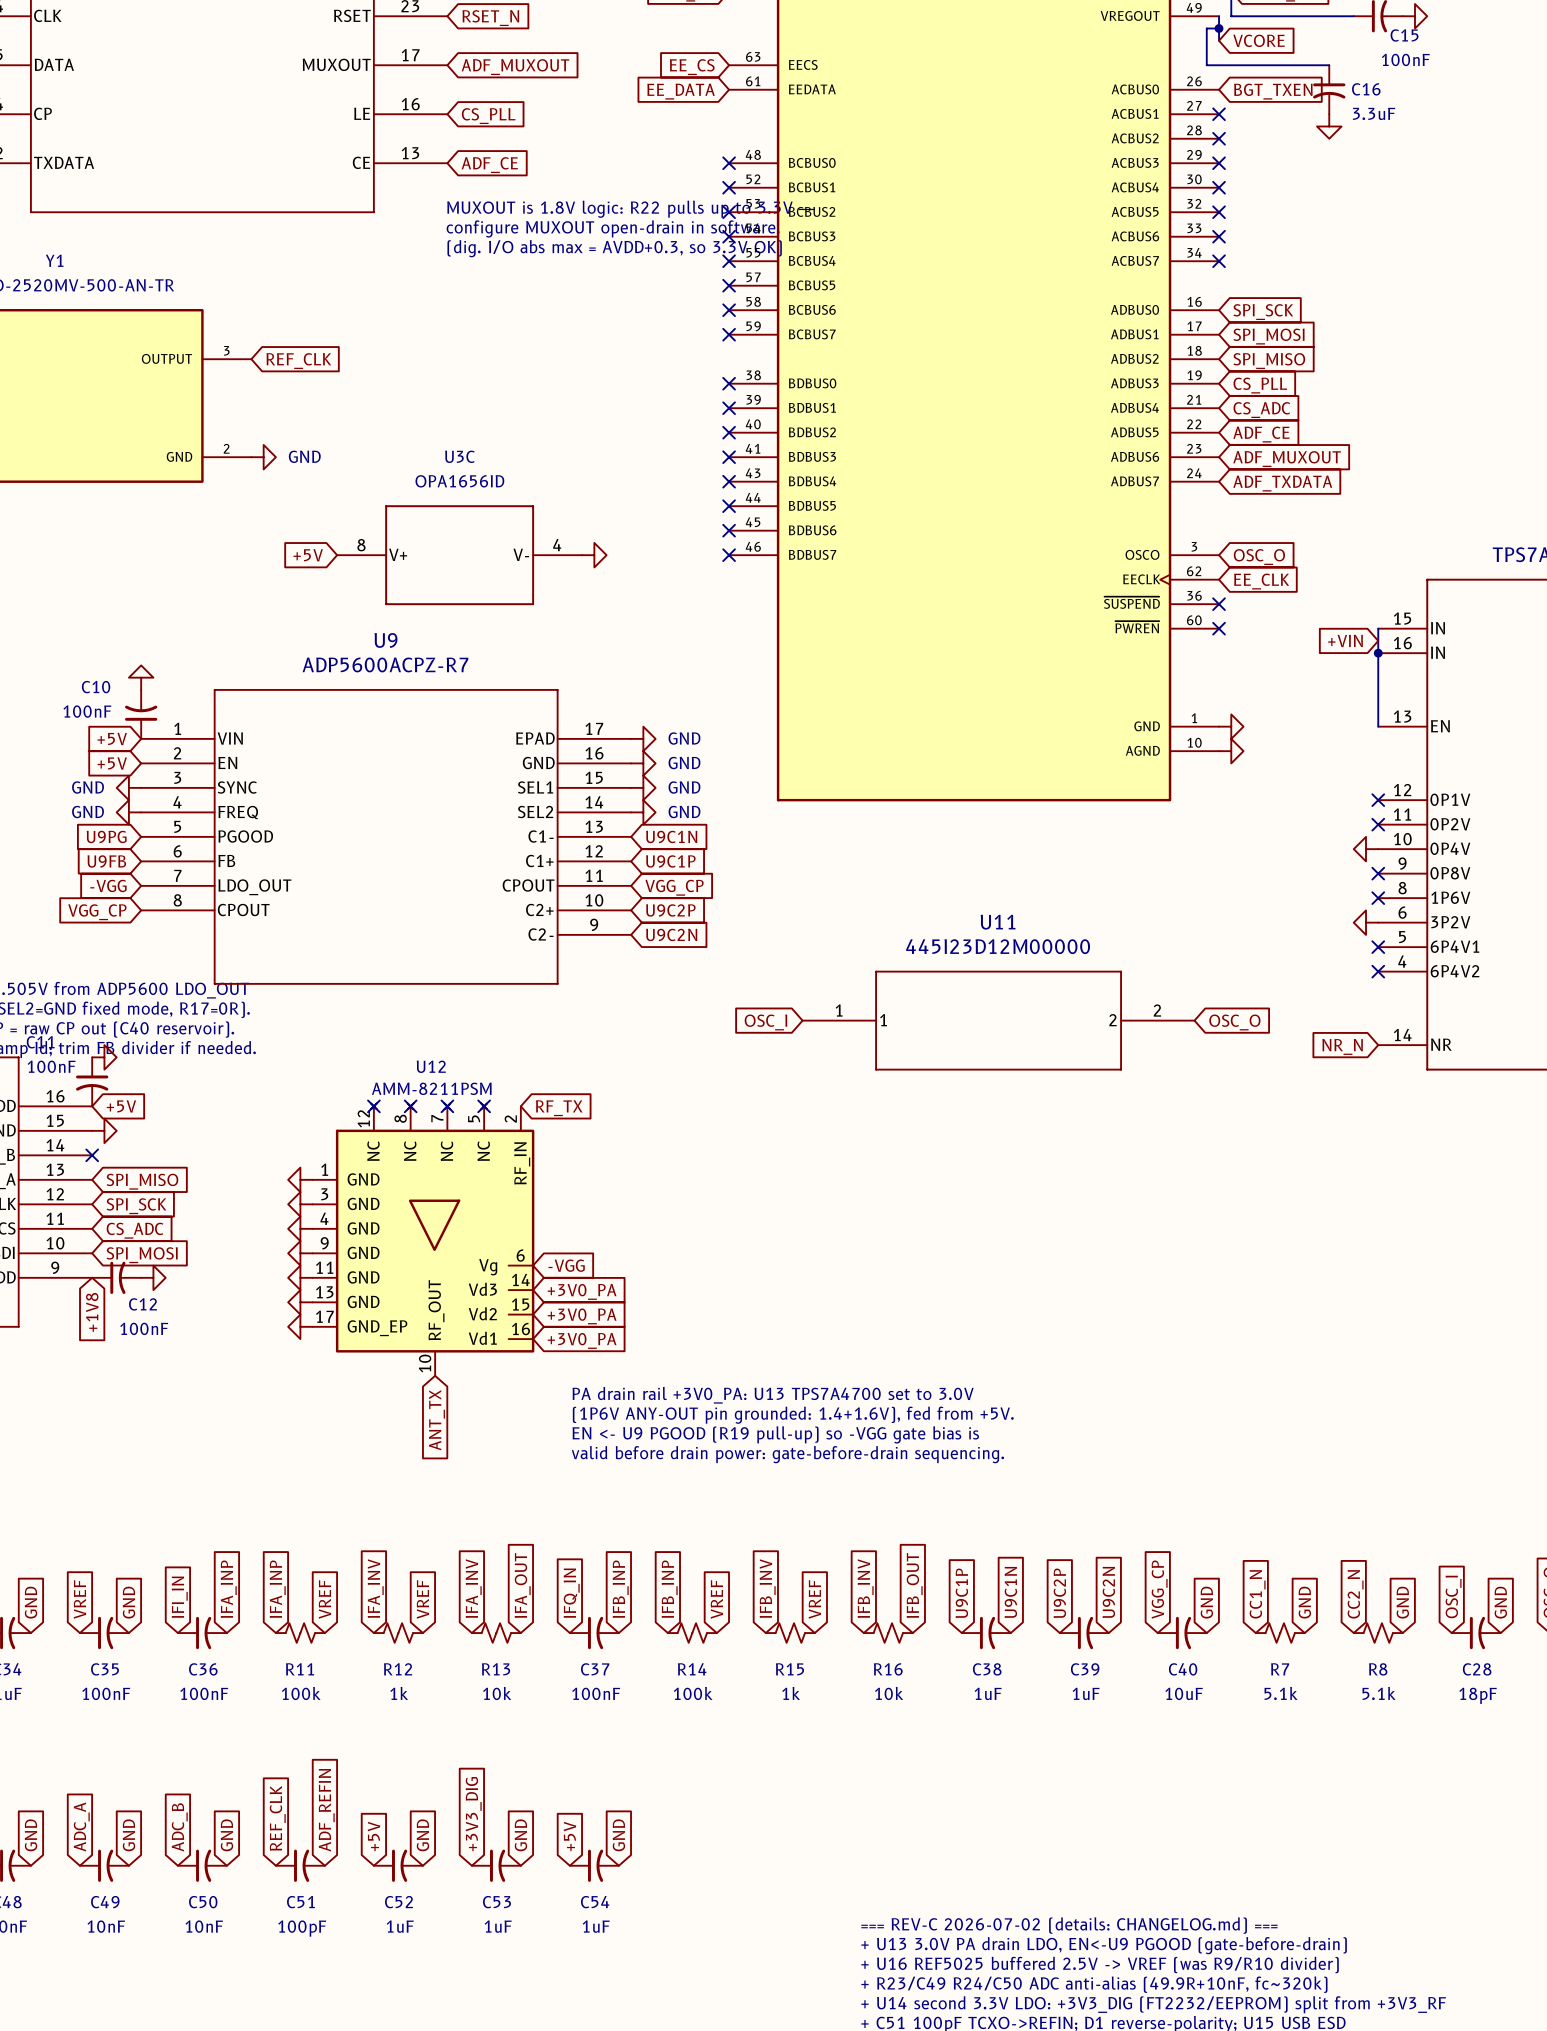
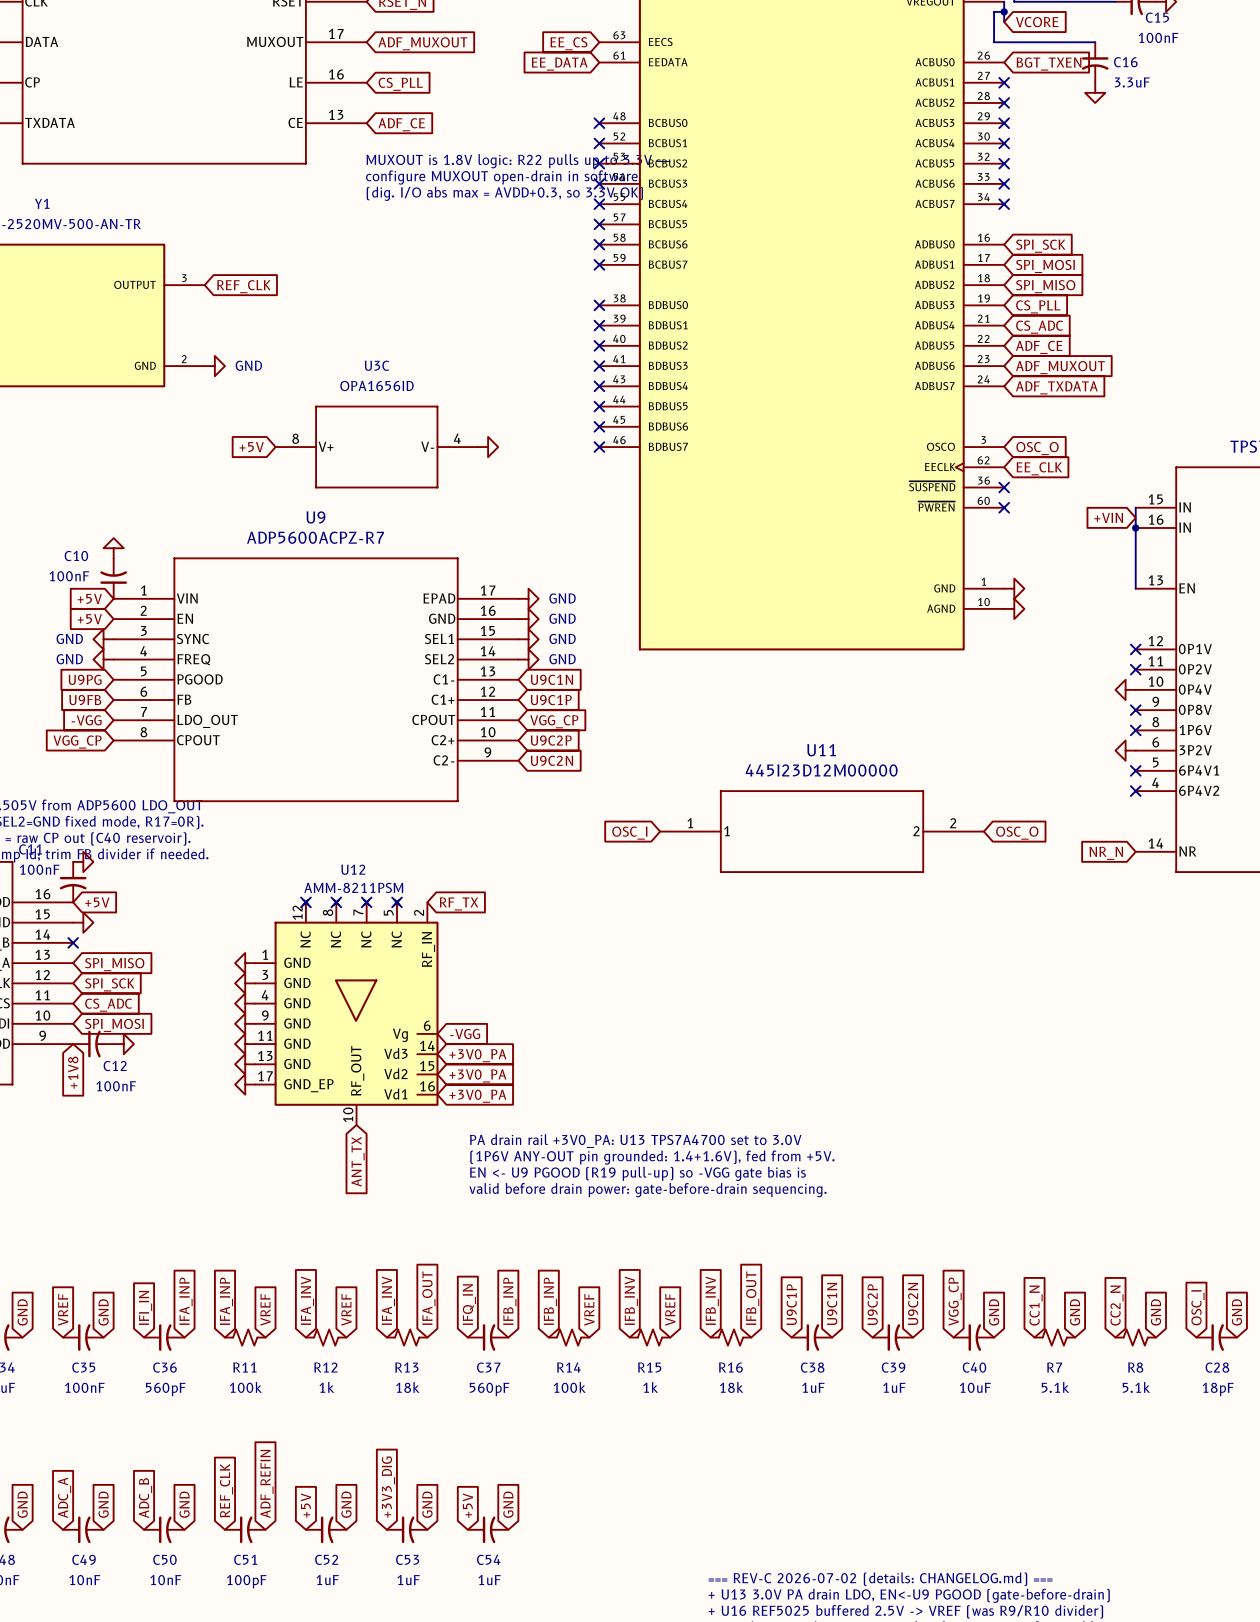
C36 value: 100nF (204, 1693) -> 560pF (165, 1389)
R13 value: 10k (497, 1693) -> 18k (407, 1387)
C37 value: 100nF (596, 1693) -> 560pF (489, 1389)
R16 value: 10k (889, 1693) -> 18k (731, 1387)

